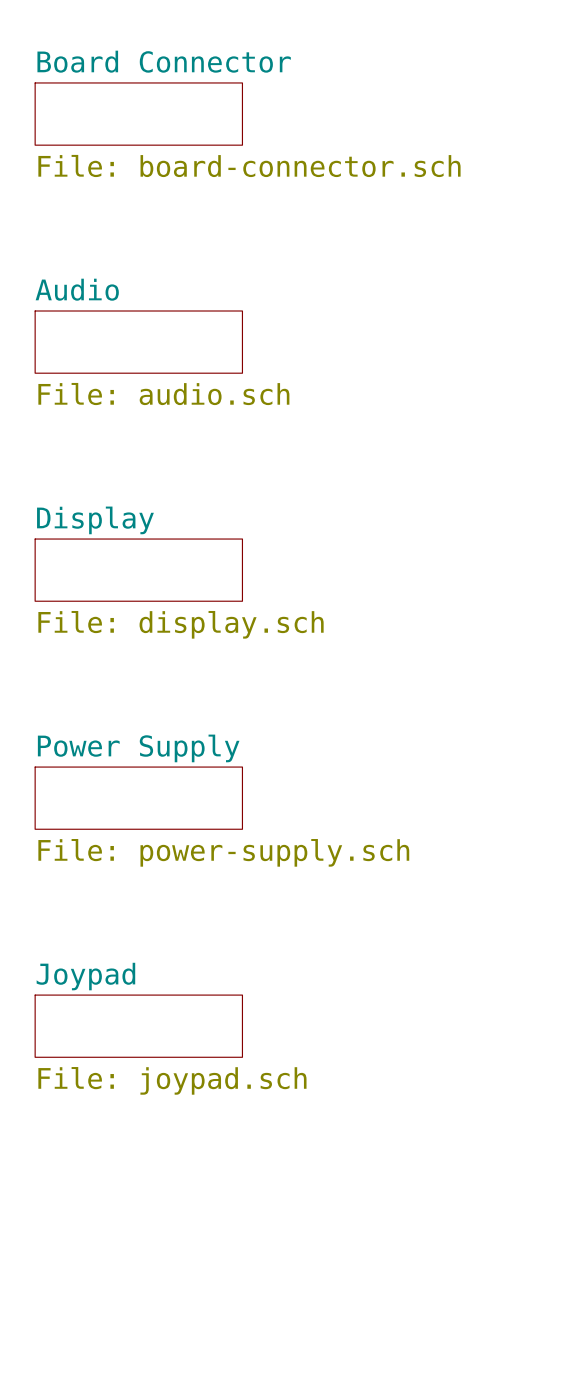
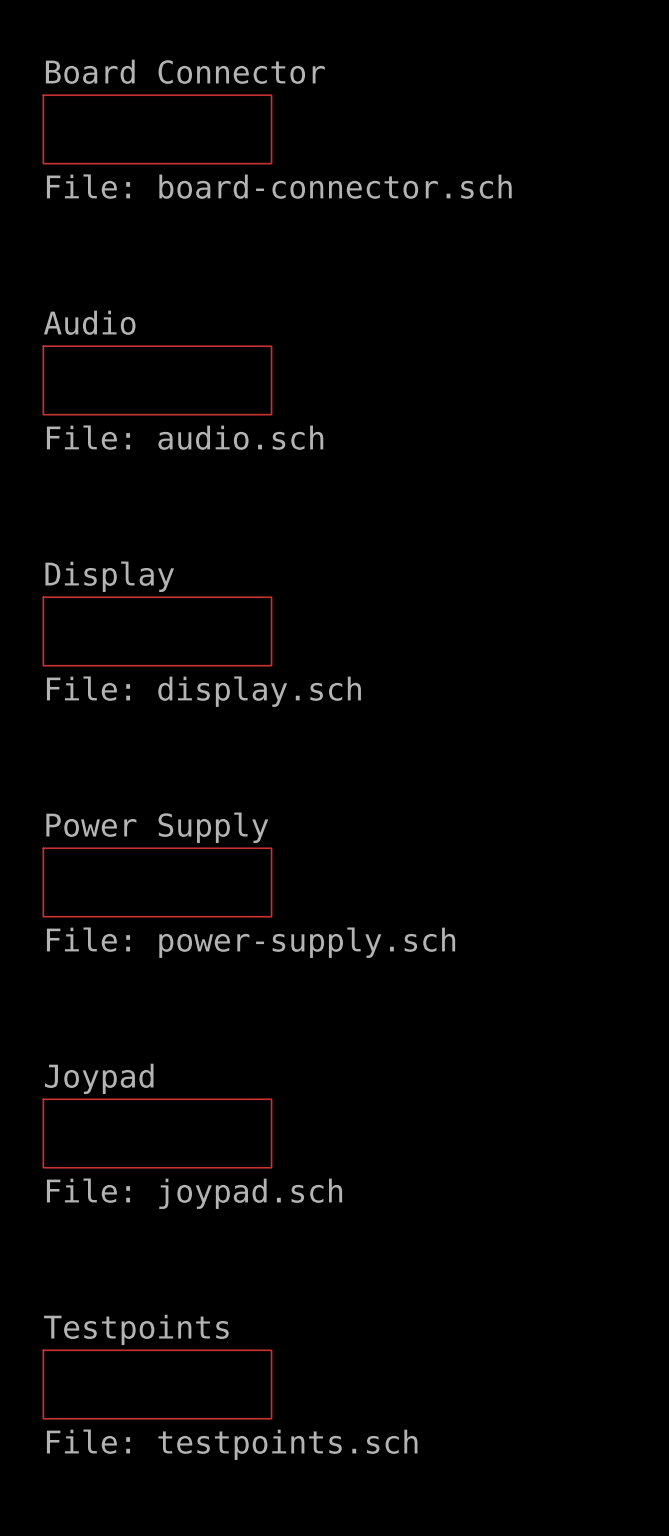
sheet Testpoints: none -> File: testpoints.sch (157, 1384)

